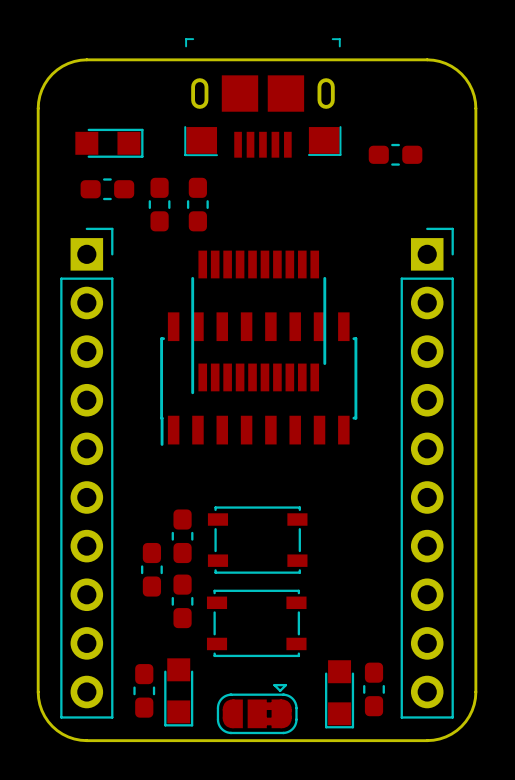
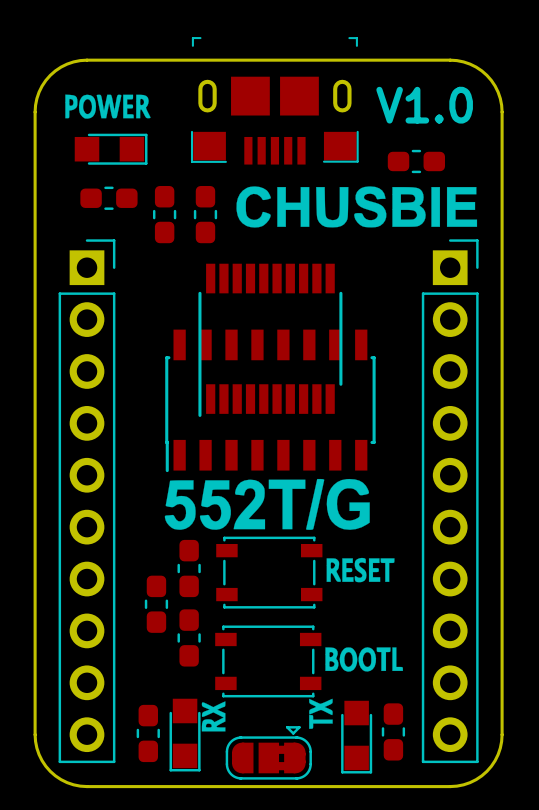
drawing: none -> [65, 94, 478, 732]
text: none -> V1.0 (424, 105)

